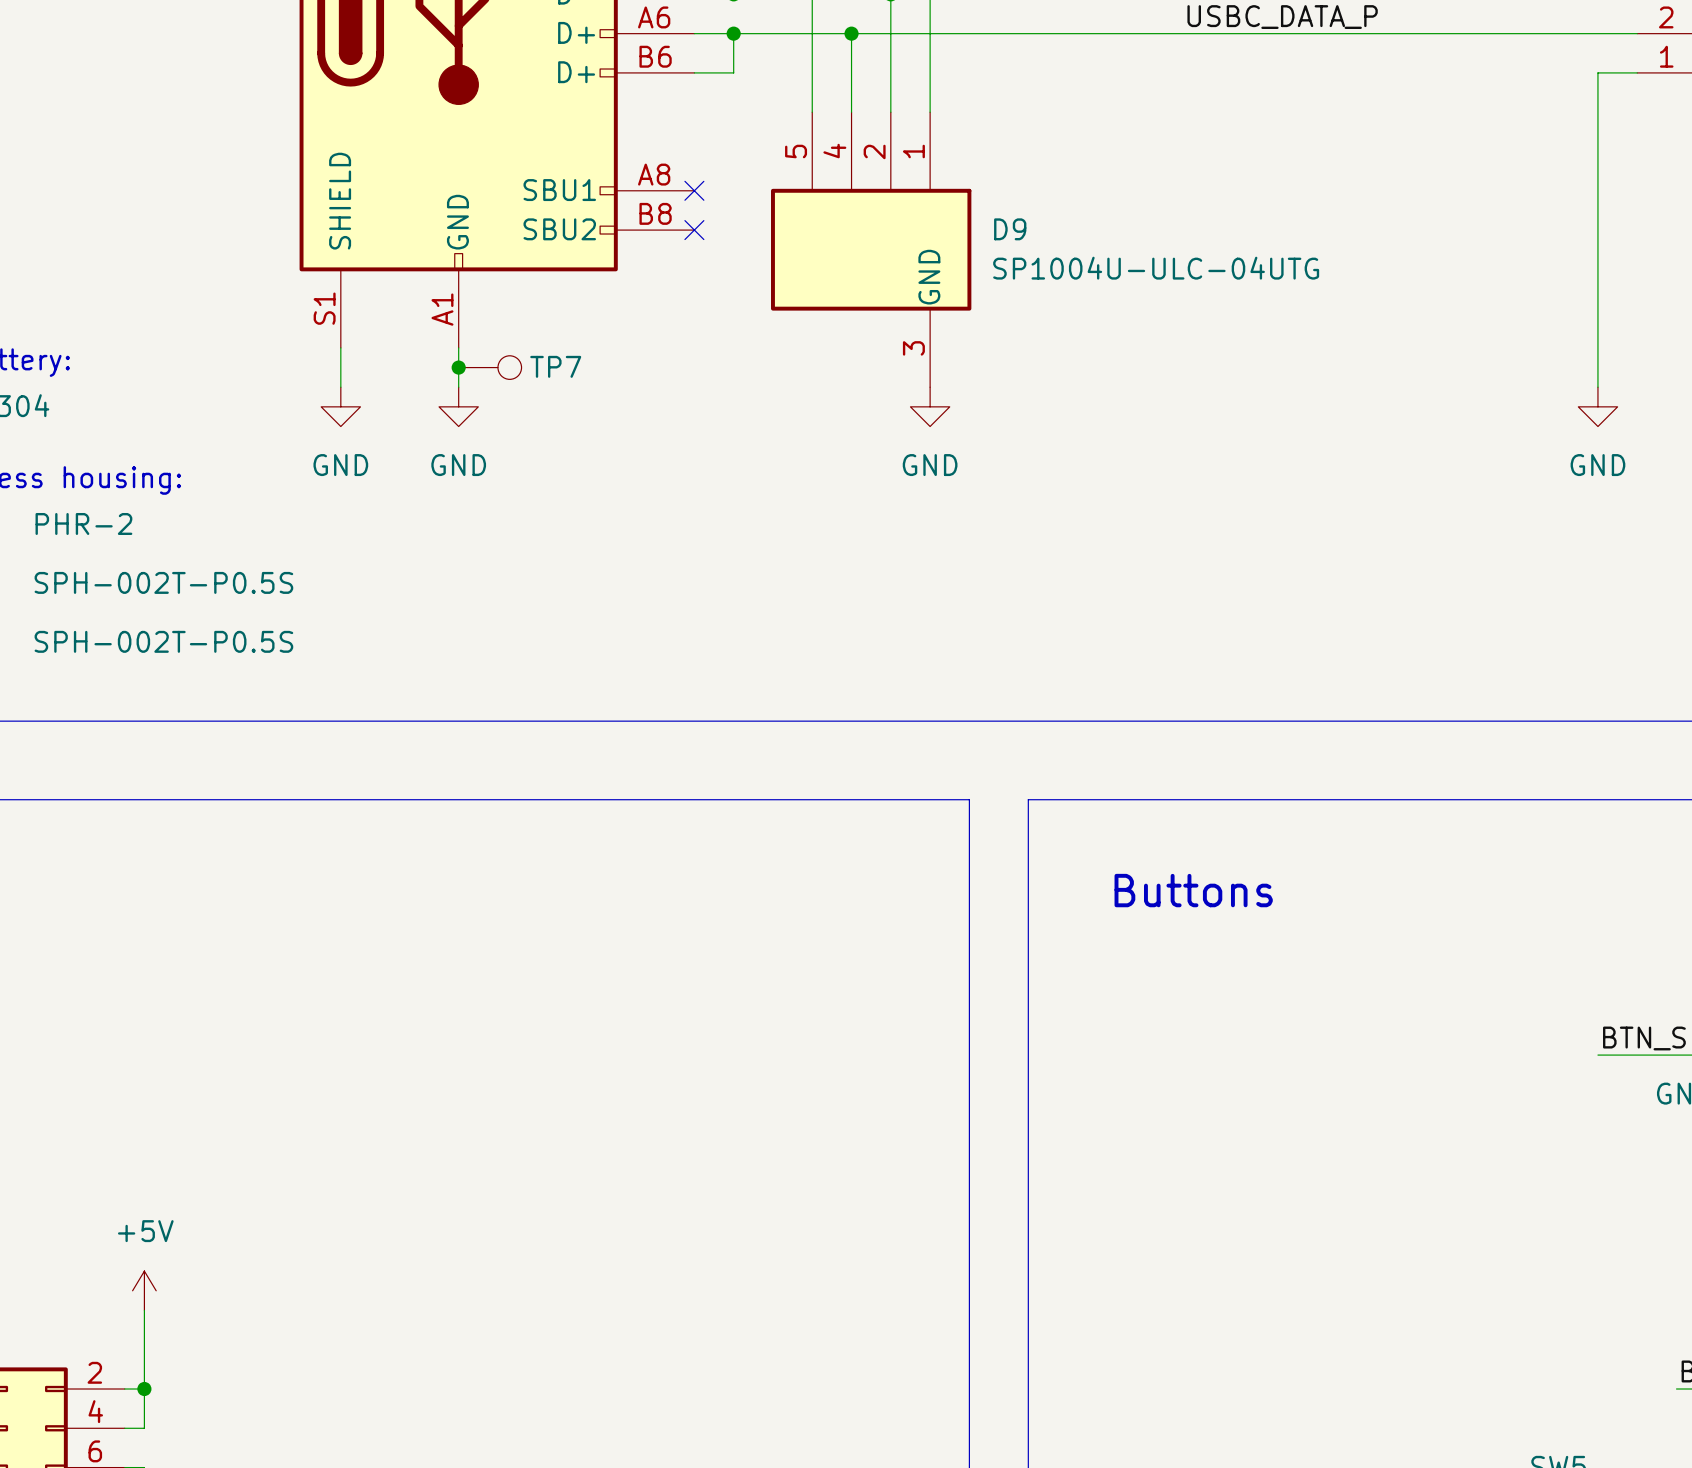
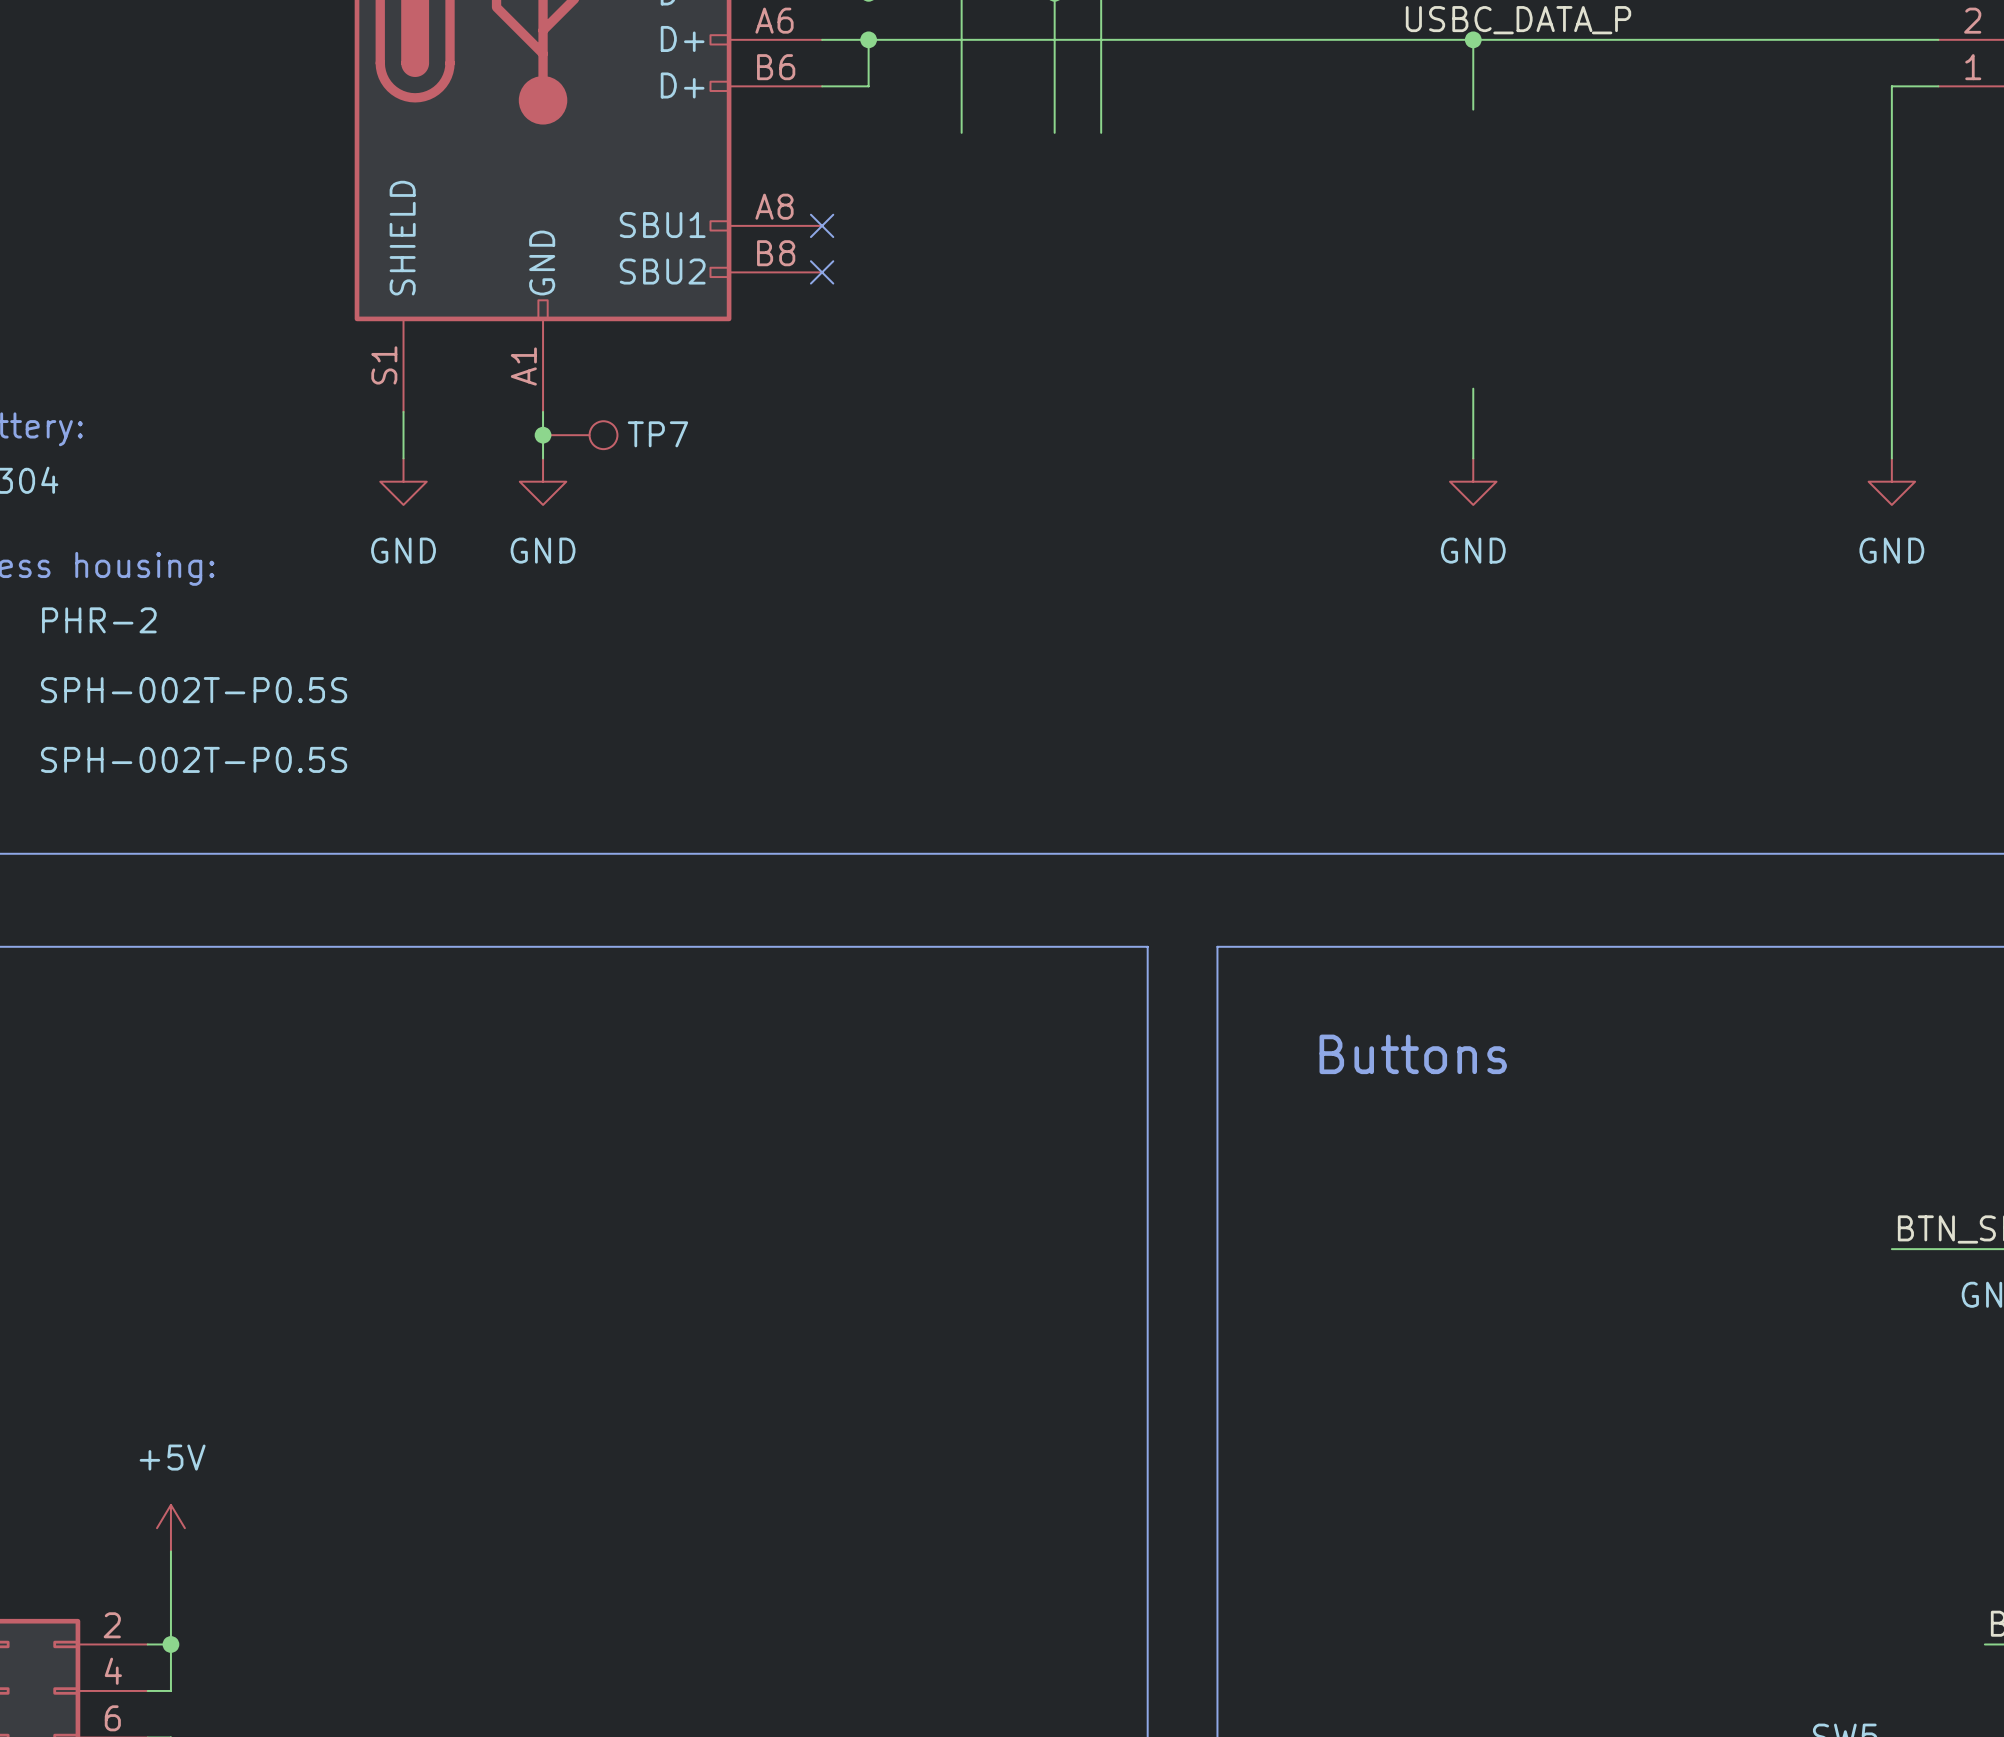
wire: (851, 33) (851, 112) -> none
junction: (851, 33) -> none
wire: none -> (1473, 39) (1473, 109)
junction: none -> (1473, 39)
D9: SP1004U-ULC-04UTG (871, 249) -> none
wire: none -> (1473, 388) (1473, 458)
power symbol: GND (930, 406) -> none
power symbol: none -> GND (1473, 481)

